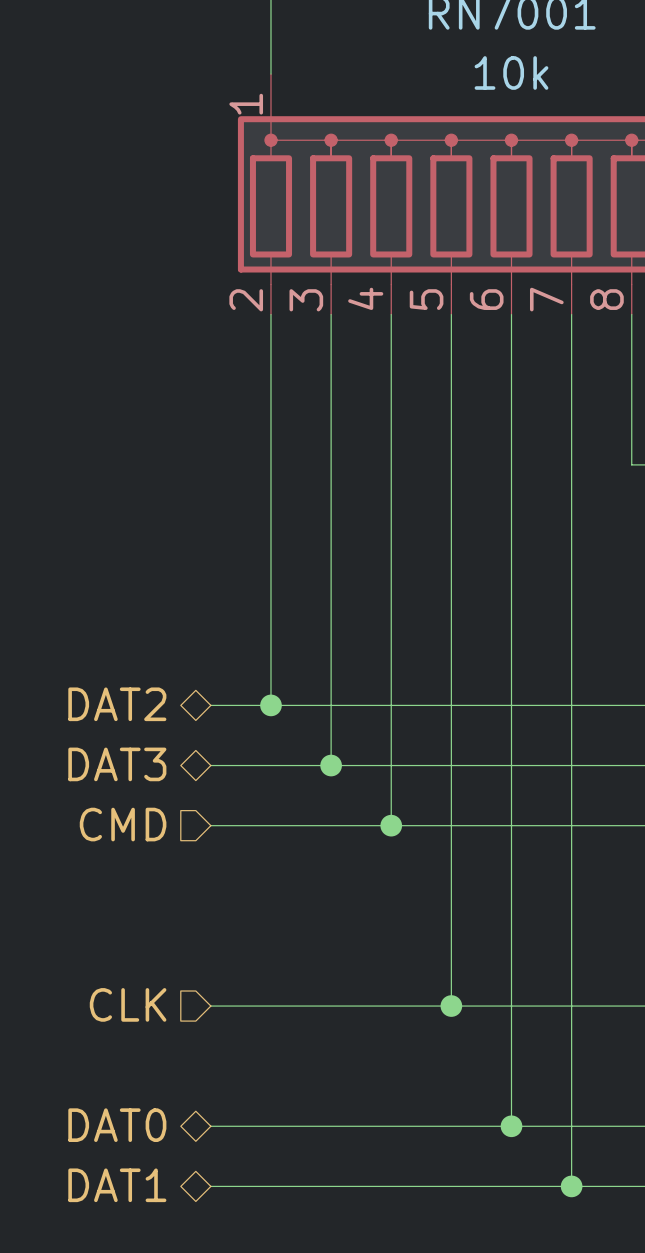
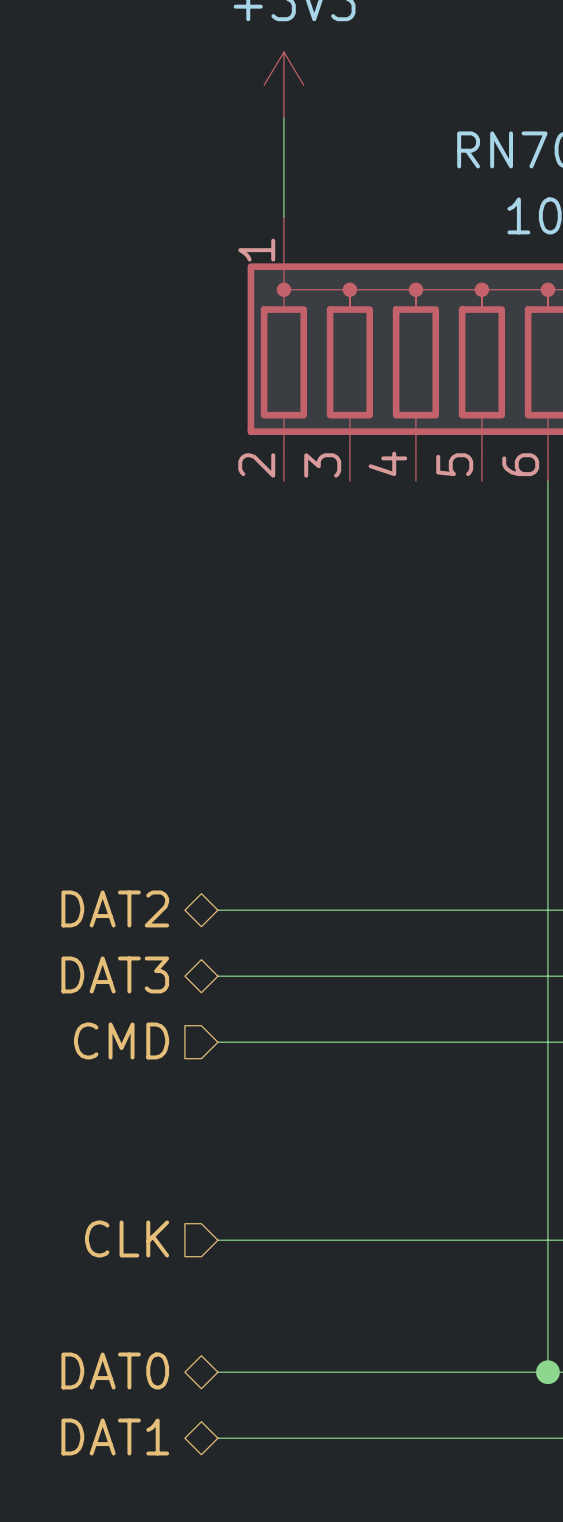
wire: (270, 314) (270, 705) -> none
wire: (331, 314) (331, 765) -> none
wire: (391, 314) (391, 825) -> none
wire: (451, 314) (451, 1006) -> none
junction: (270, 705) -> none
junction: (331, 765) -> none
junction: (391, 825) -> none
junction: (451, 1006) -> none

